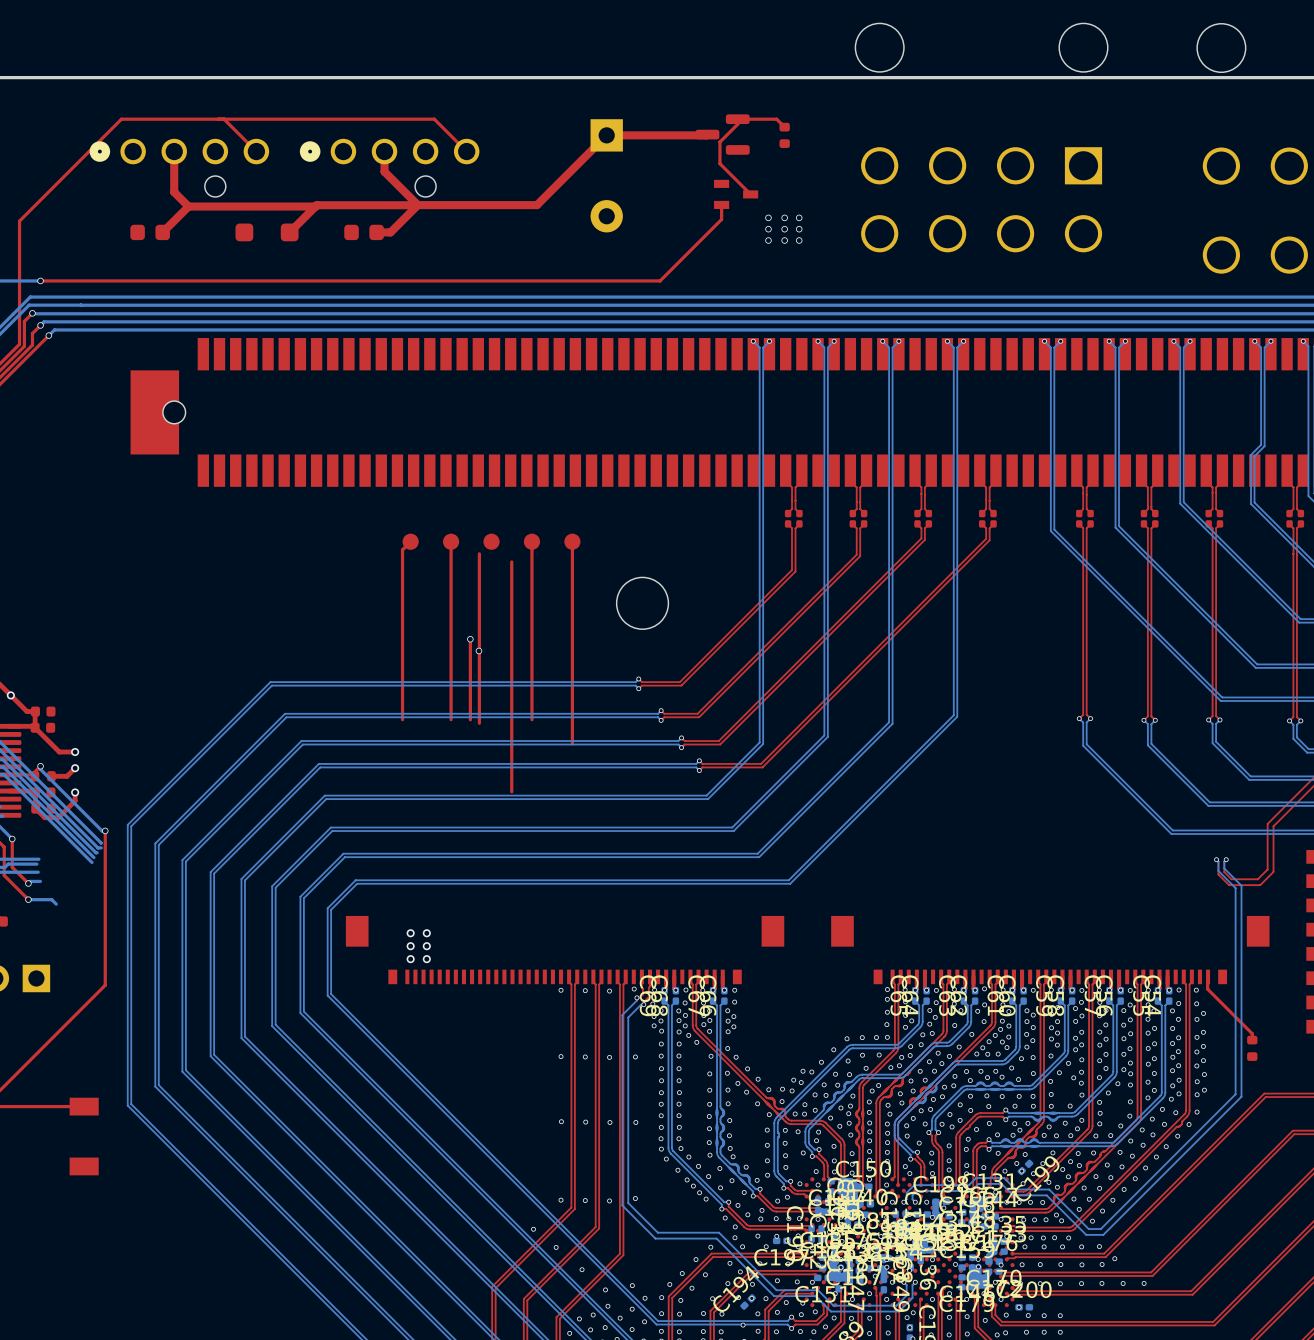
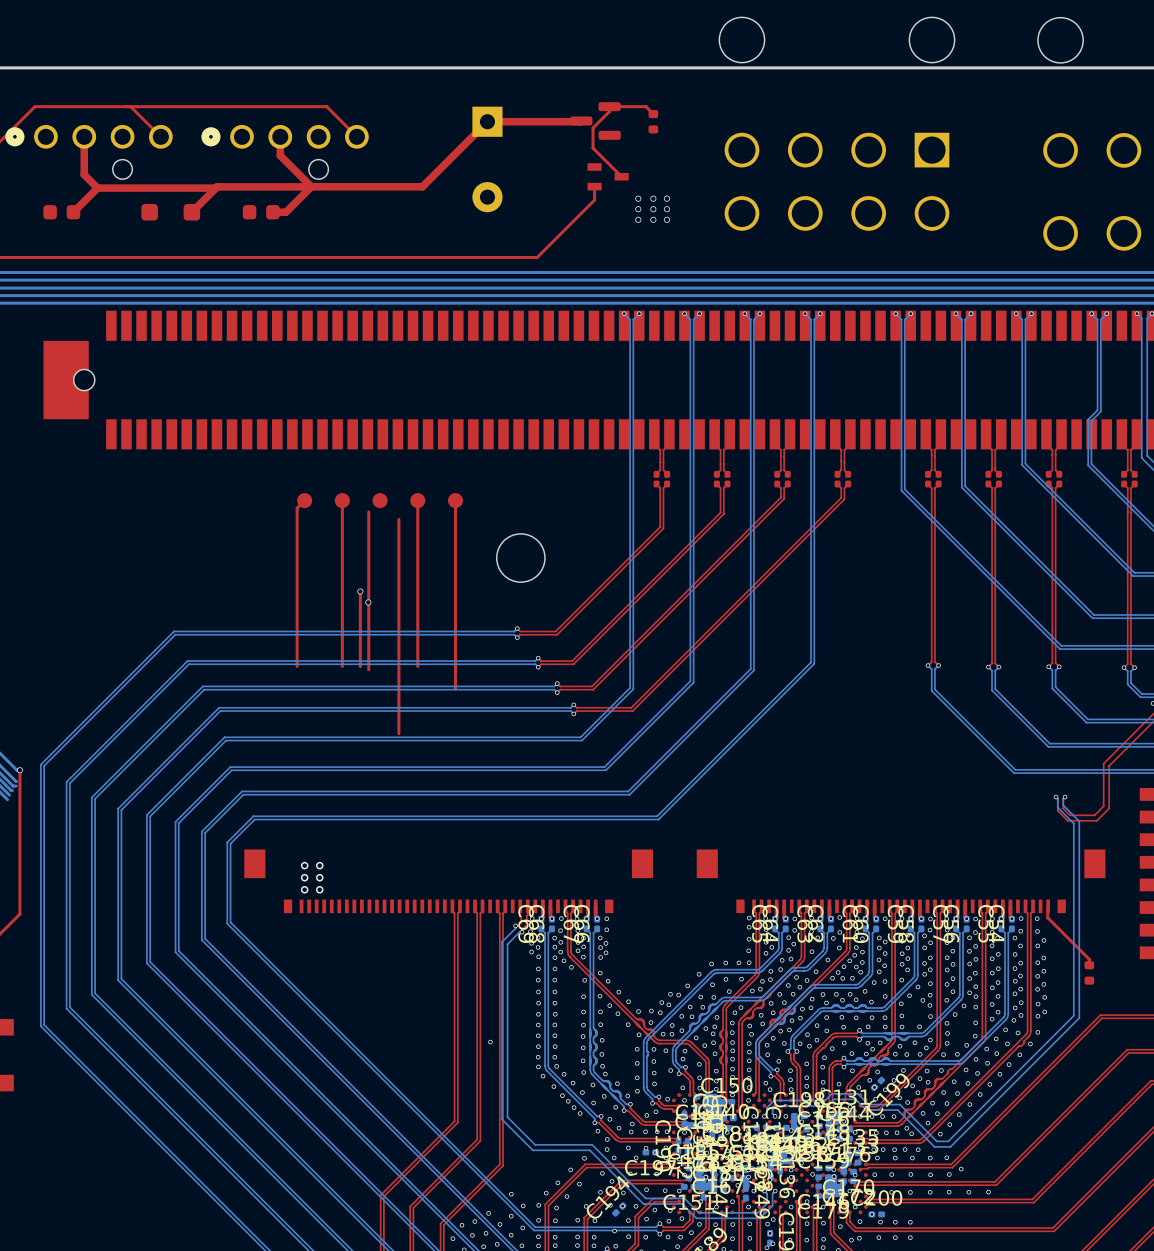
via: (634, 989) -> none
via: (561, 990) -> none
via: (585, 990) -> none
via: (609, 991) -> none
via: (561, 1056) -> none
via: (585, 1056) -> none
via: (635, 1056) -> none
via: (609, 1057) -> none
via: (561, 1121) -> none
via: (585, 1122) -> none
via: (635, 1122) -> none
via: (635, 1198) -> none
via: (561, 1200) -> none
via: (585, 1200) -> none
via: (609, 1200) -> none
via: (533, 1229) -> none
via: (556, 1247) -> none
via: (582, 1269) -> none
via: (605, 1289) -> none

